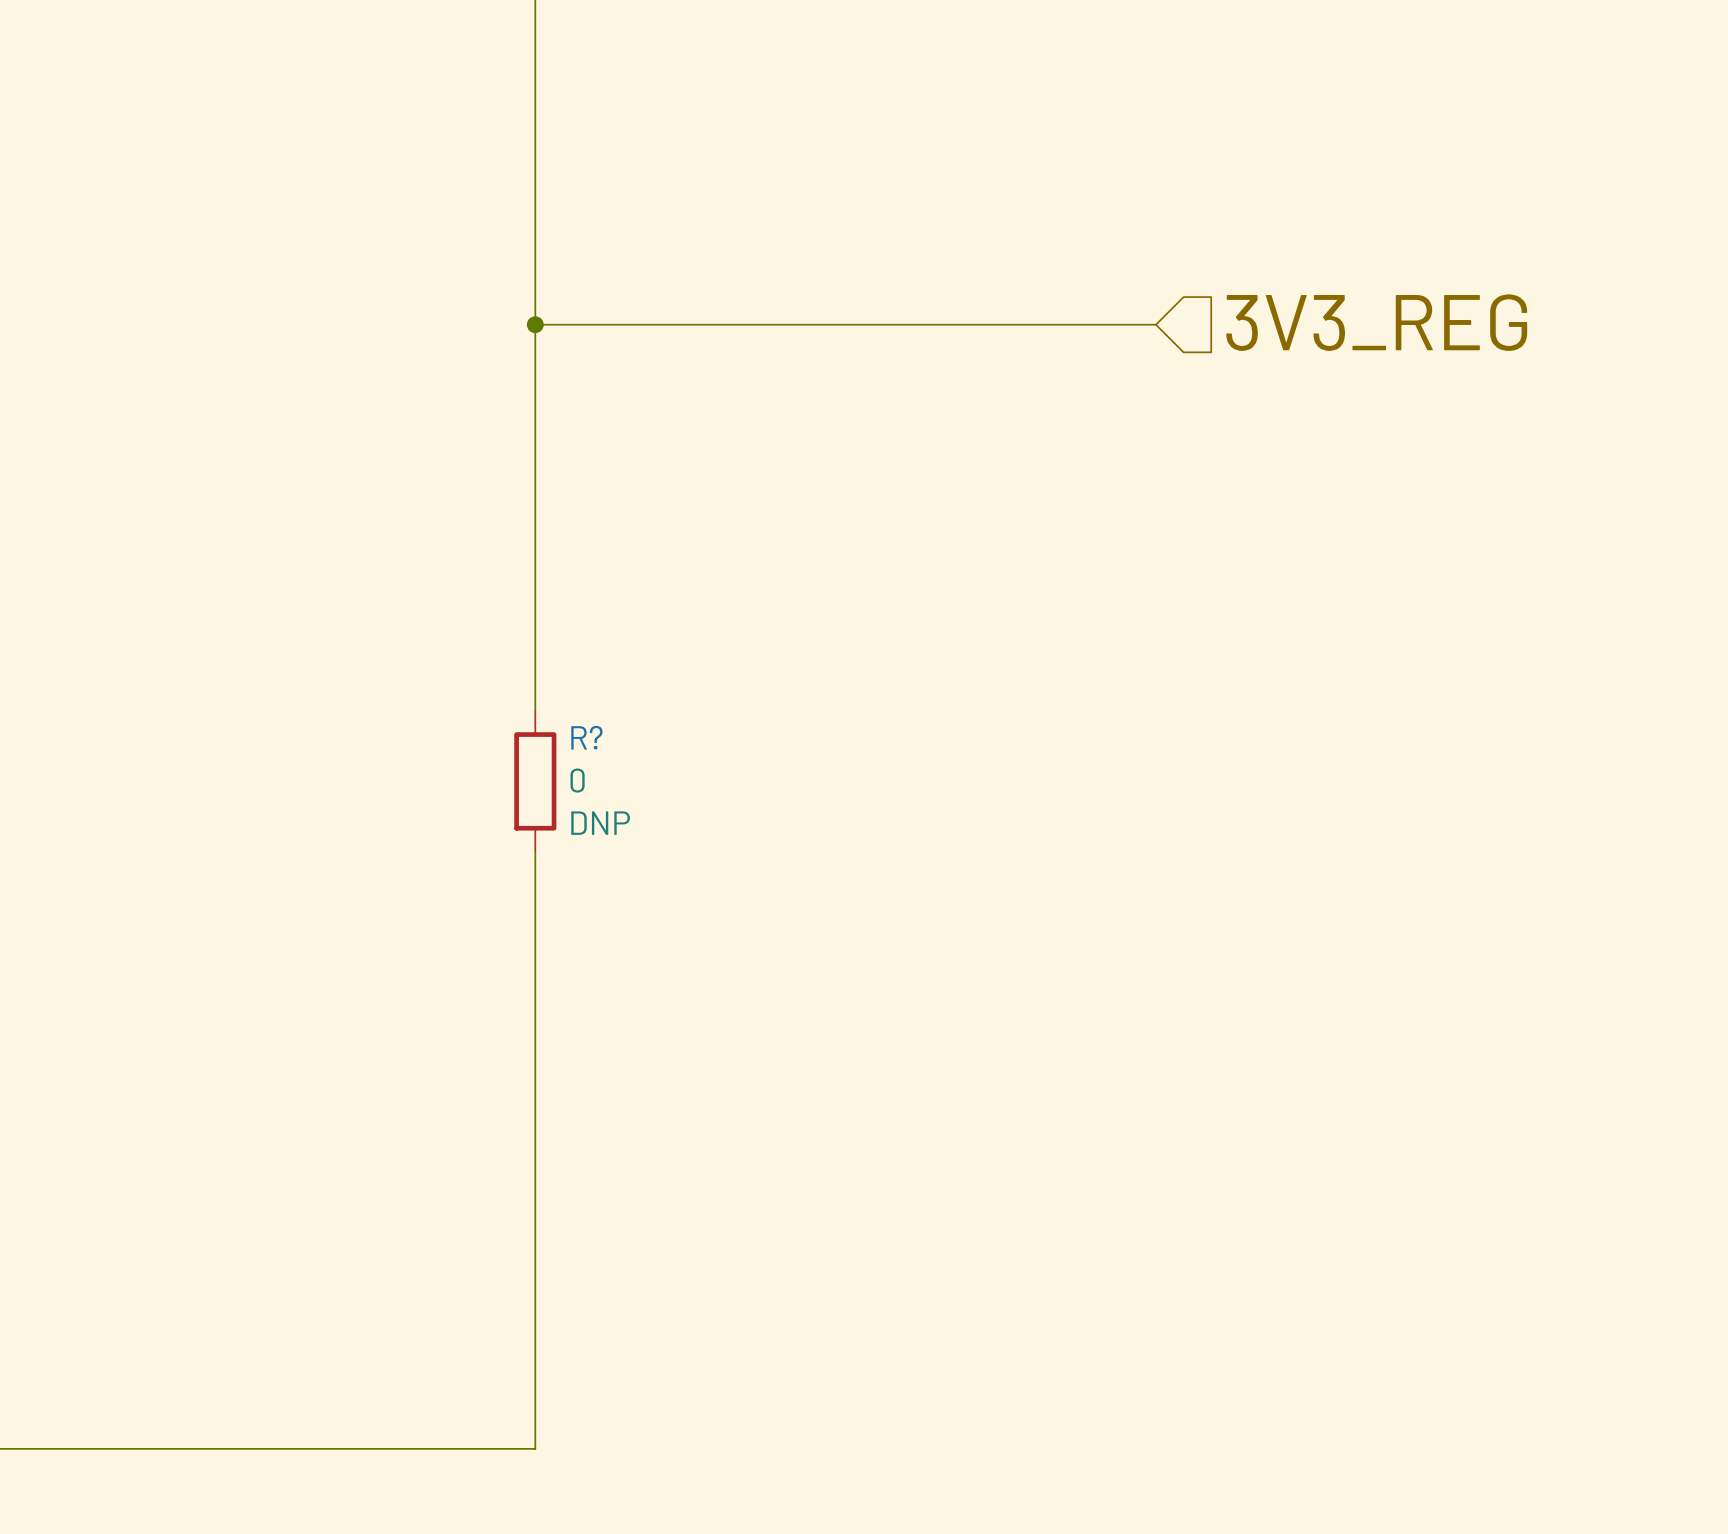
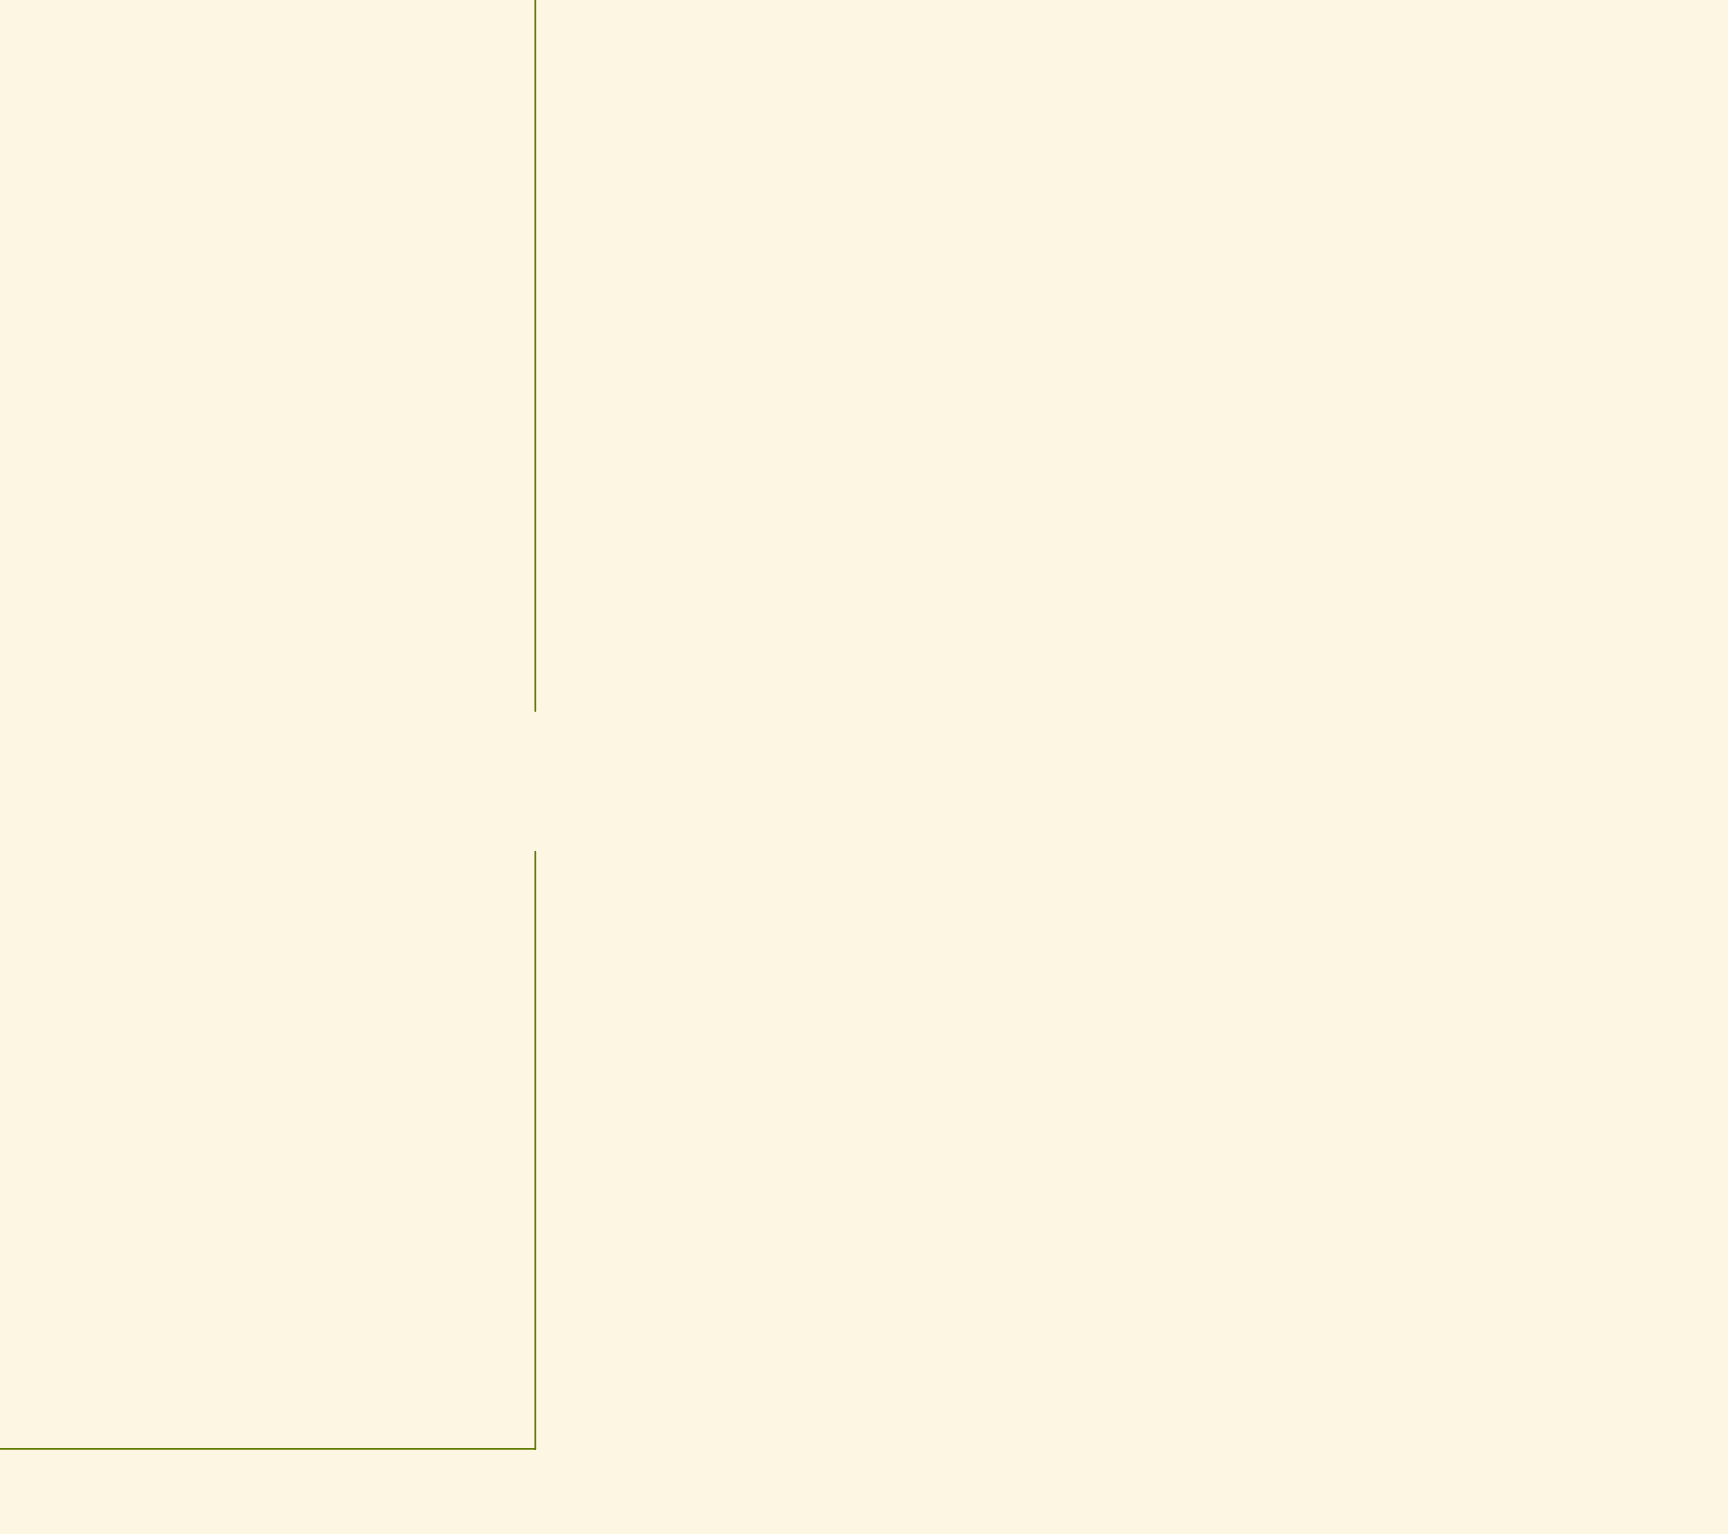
hierarchical label: 3V3_REG (1376, 322) -> none
wire: (535, 324) (1155, 324) -> none
junction: (535, 324) -> none
R?: 0 (535, 781) -> none

